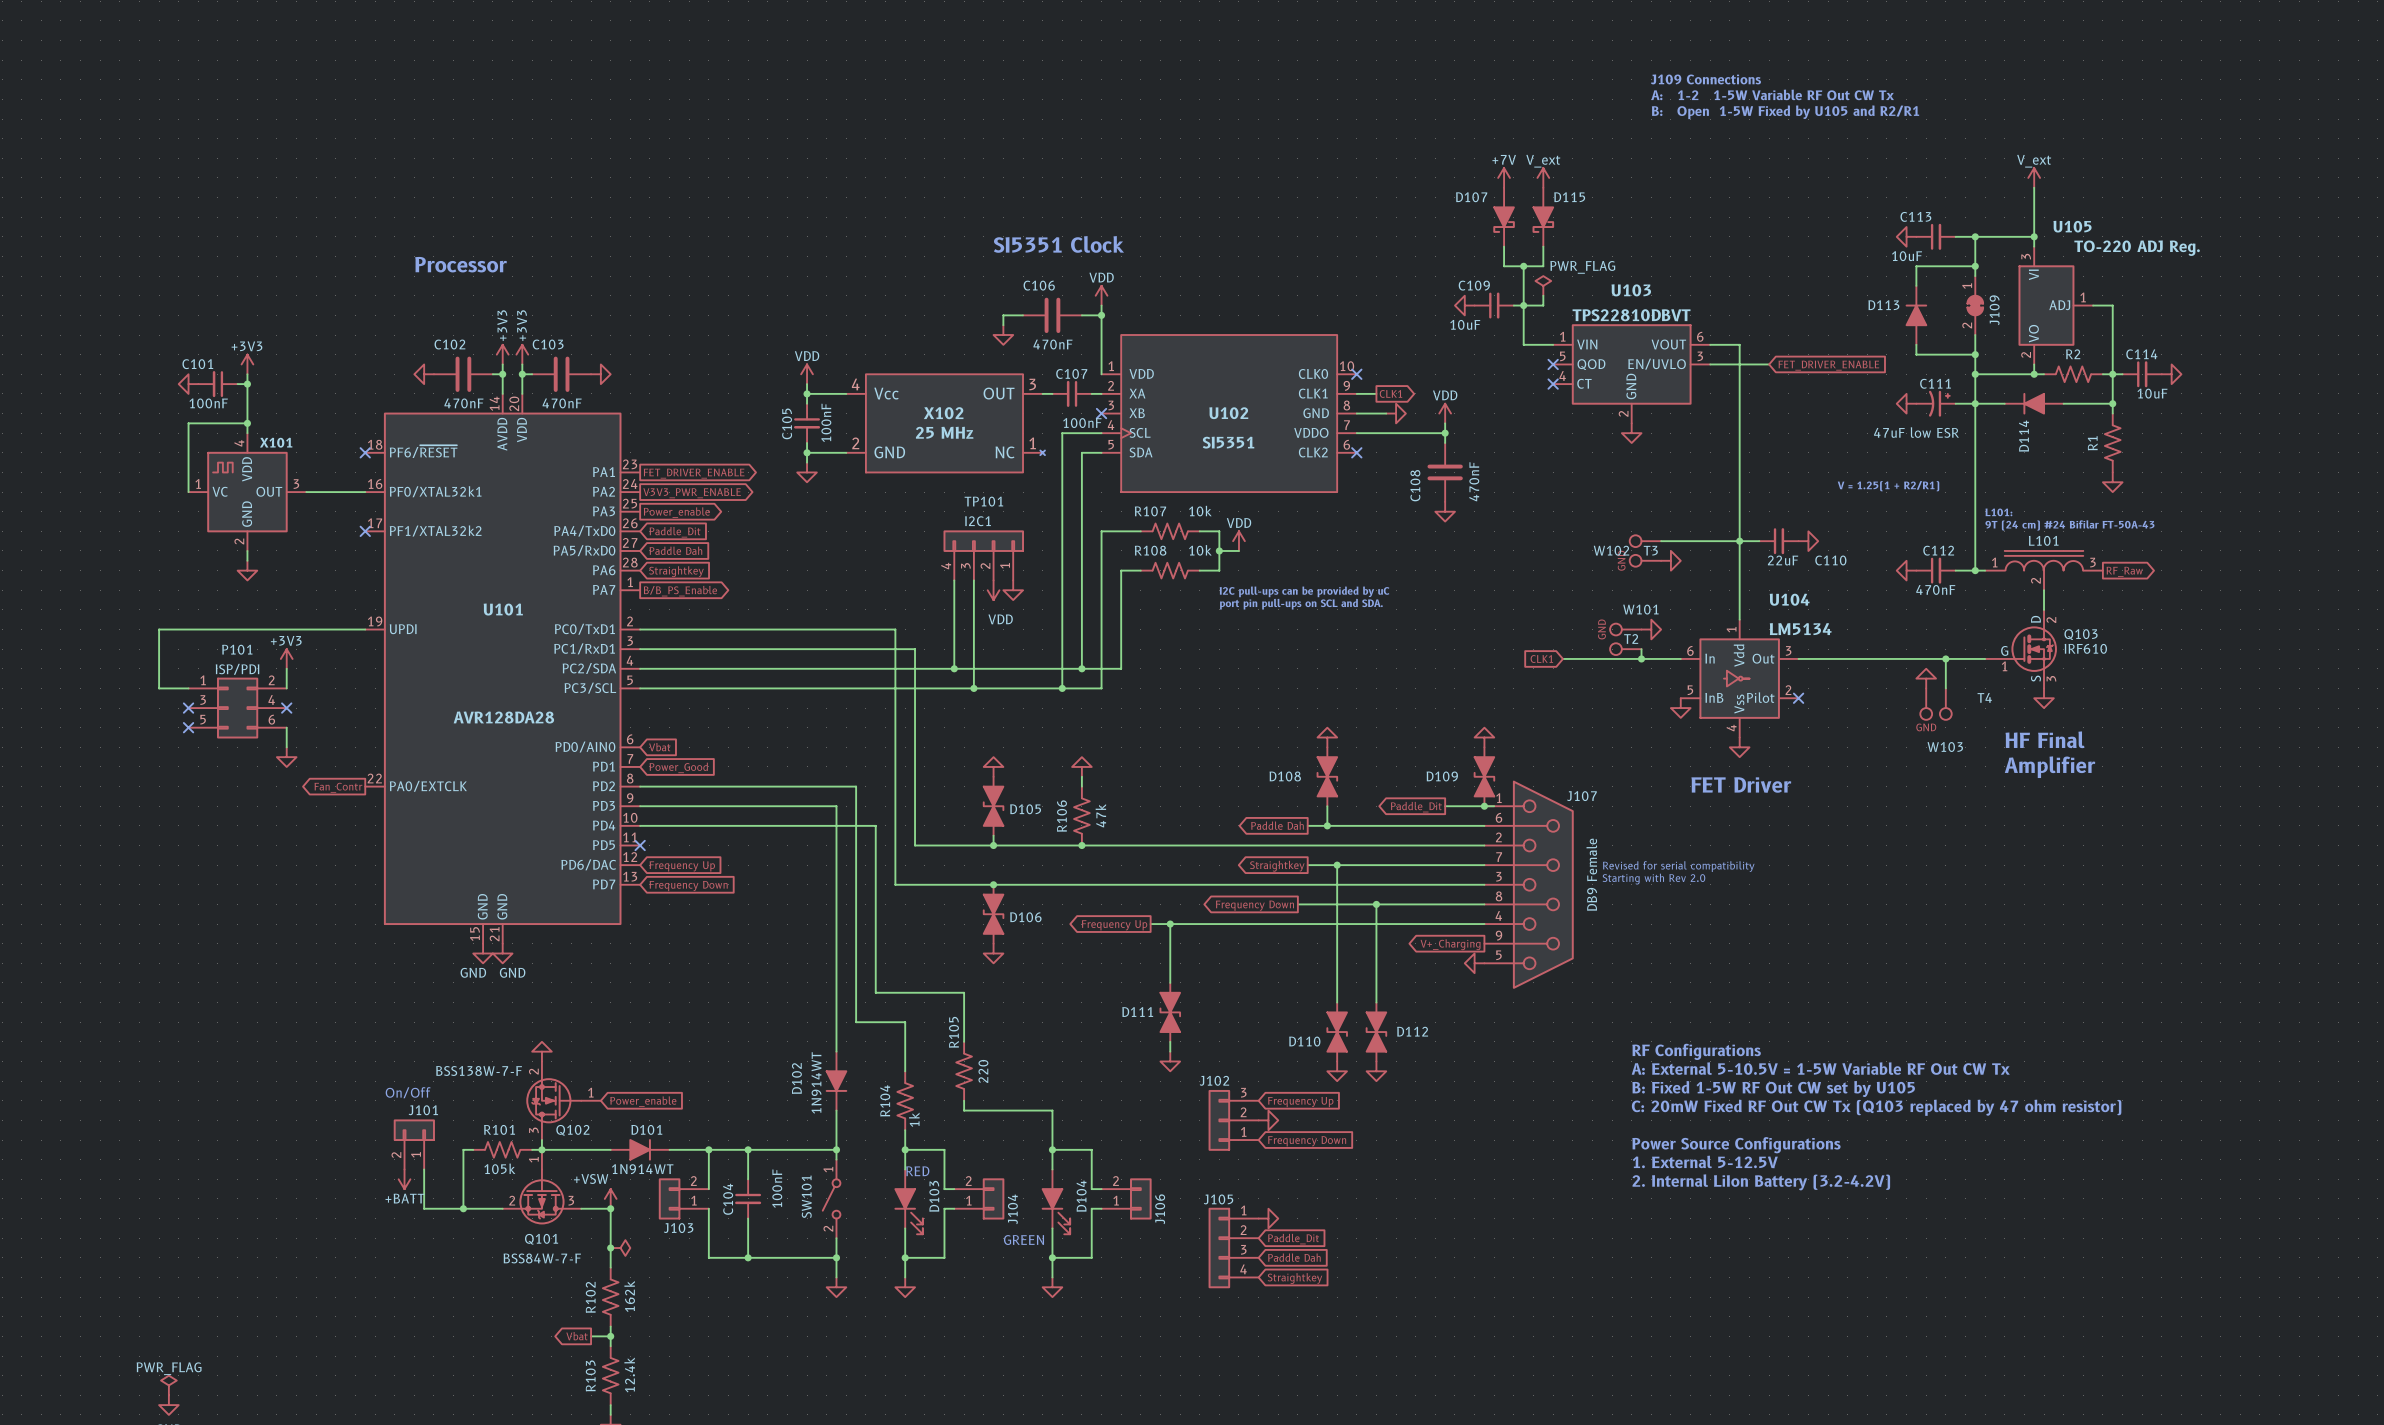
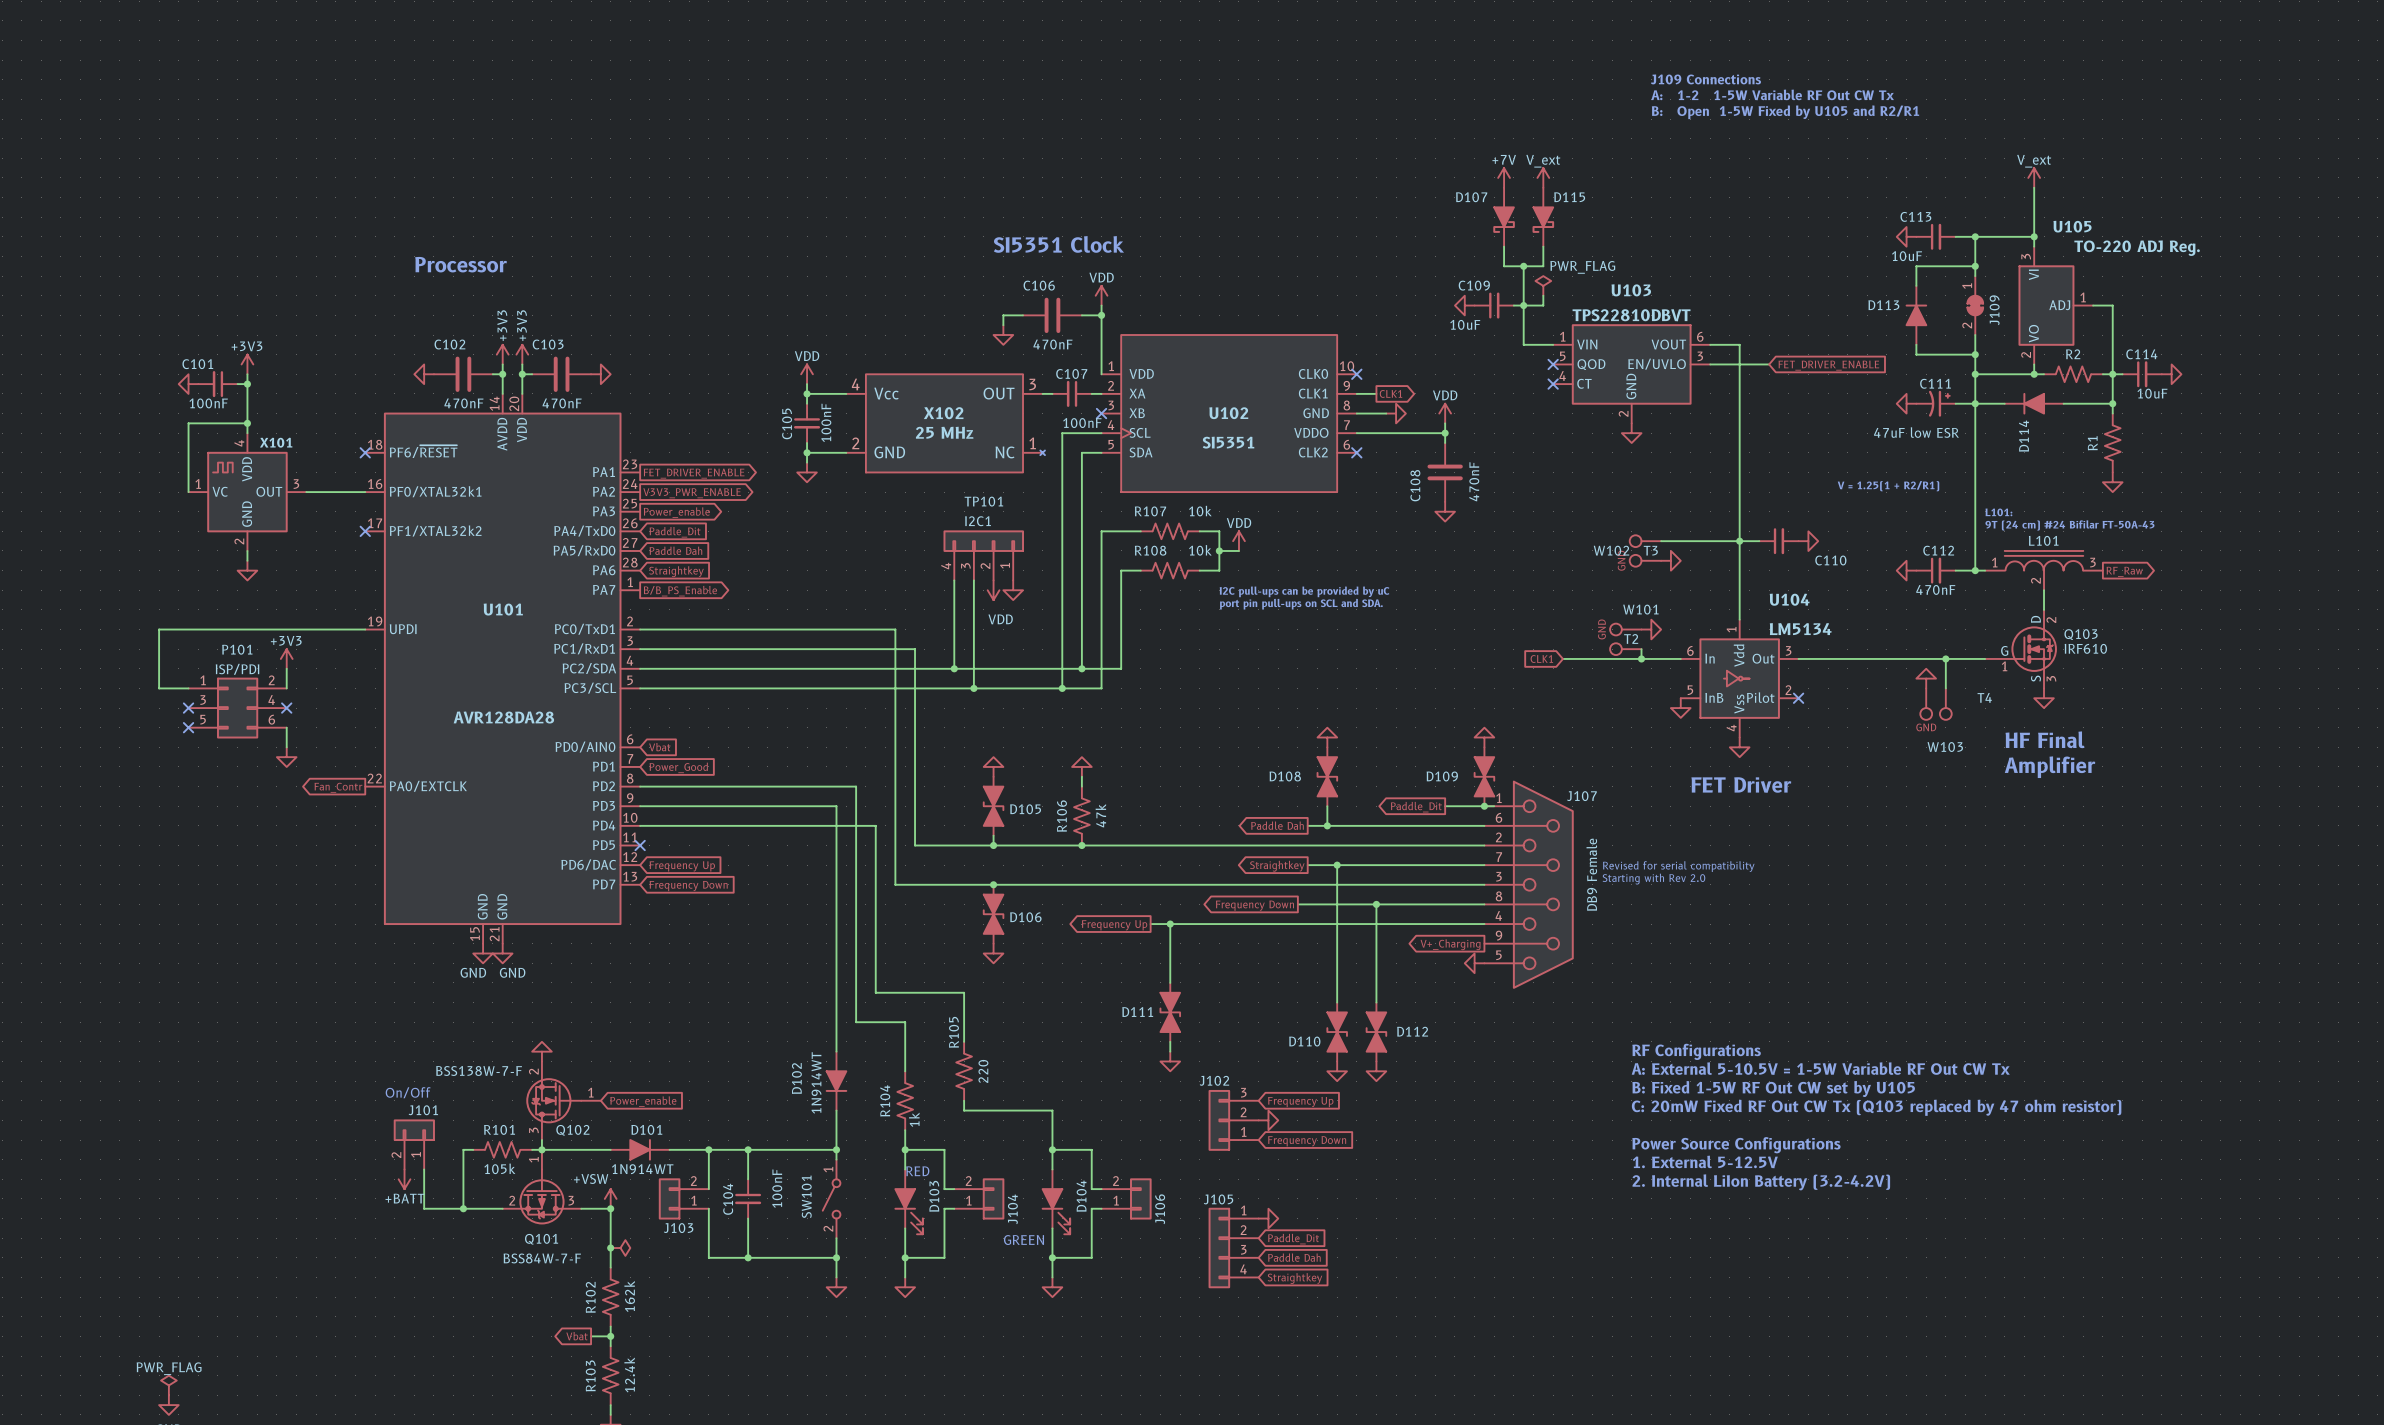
C110 value: 22uF (1783, 560) -> none

